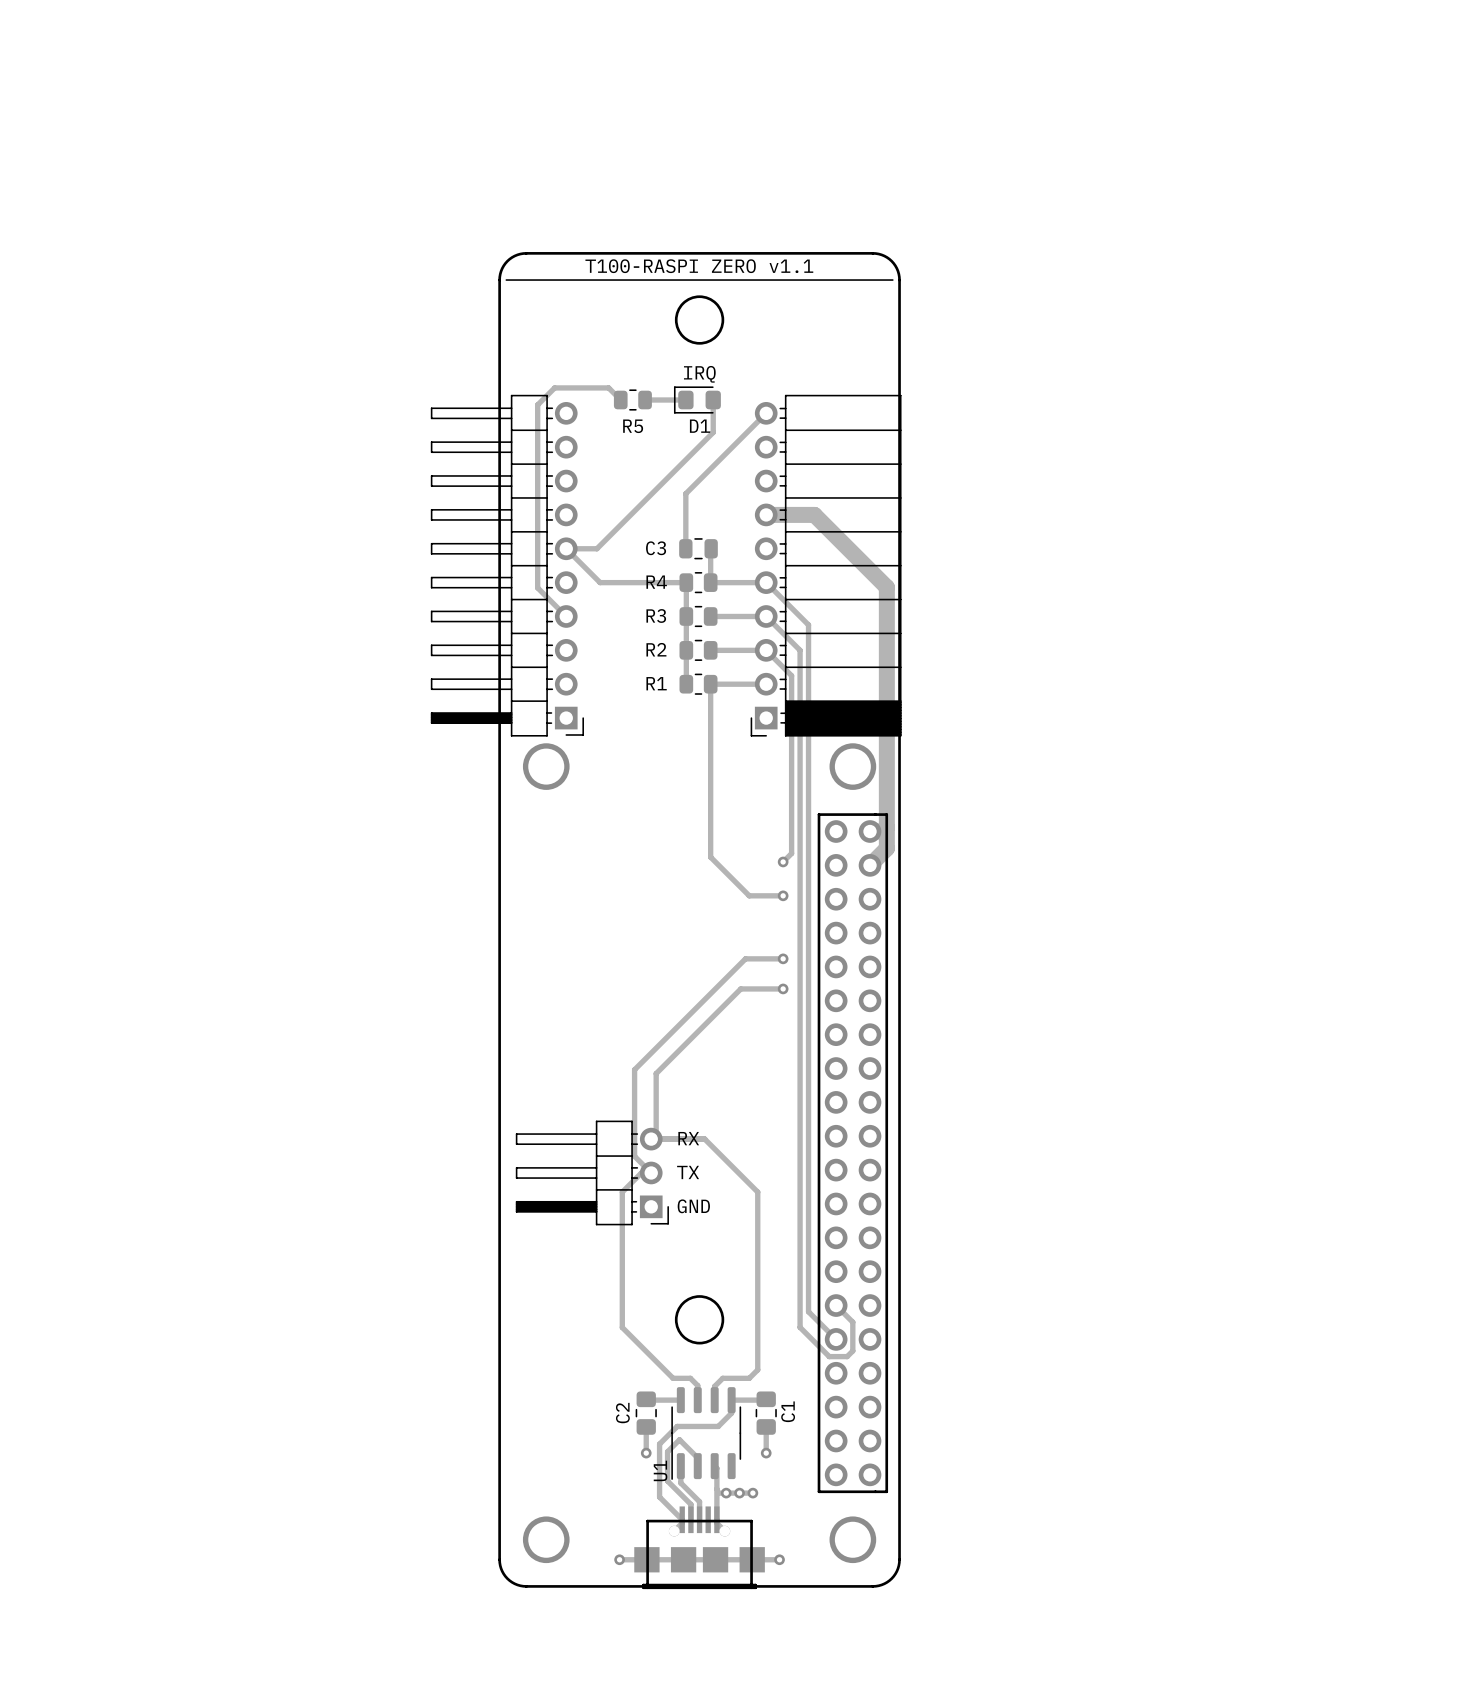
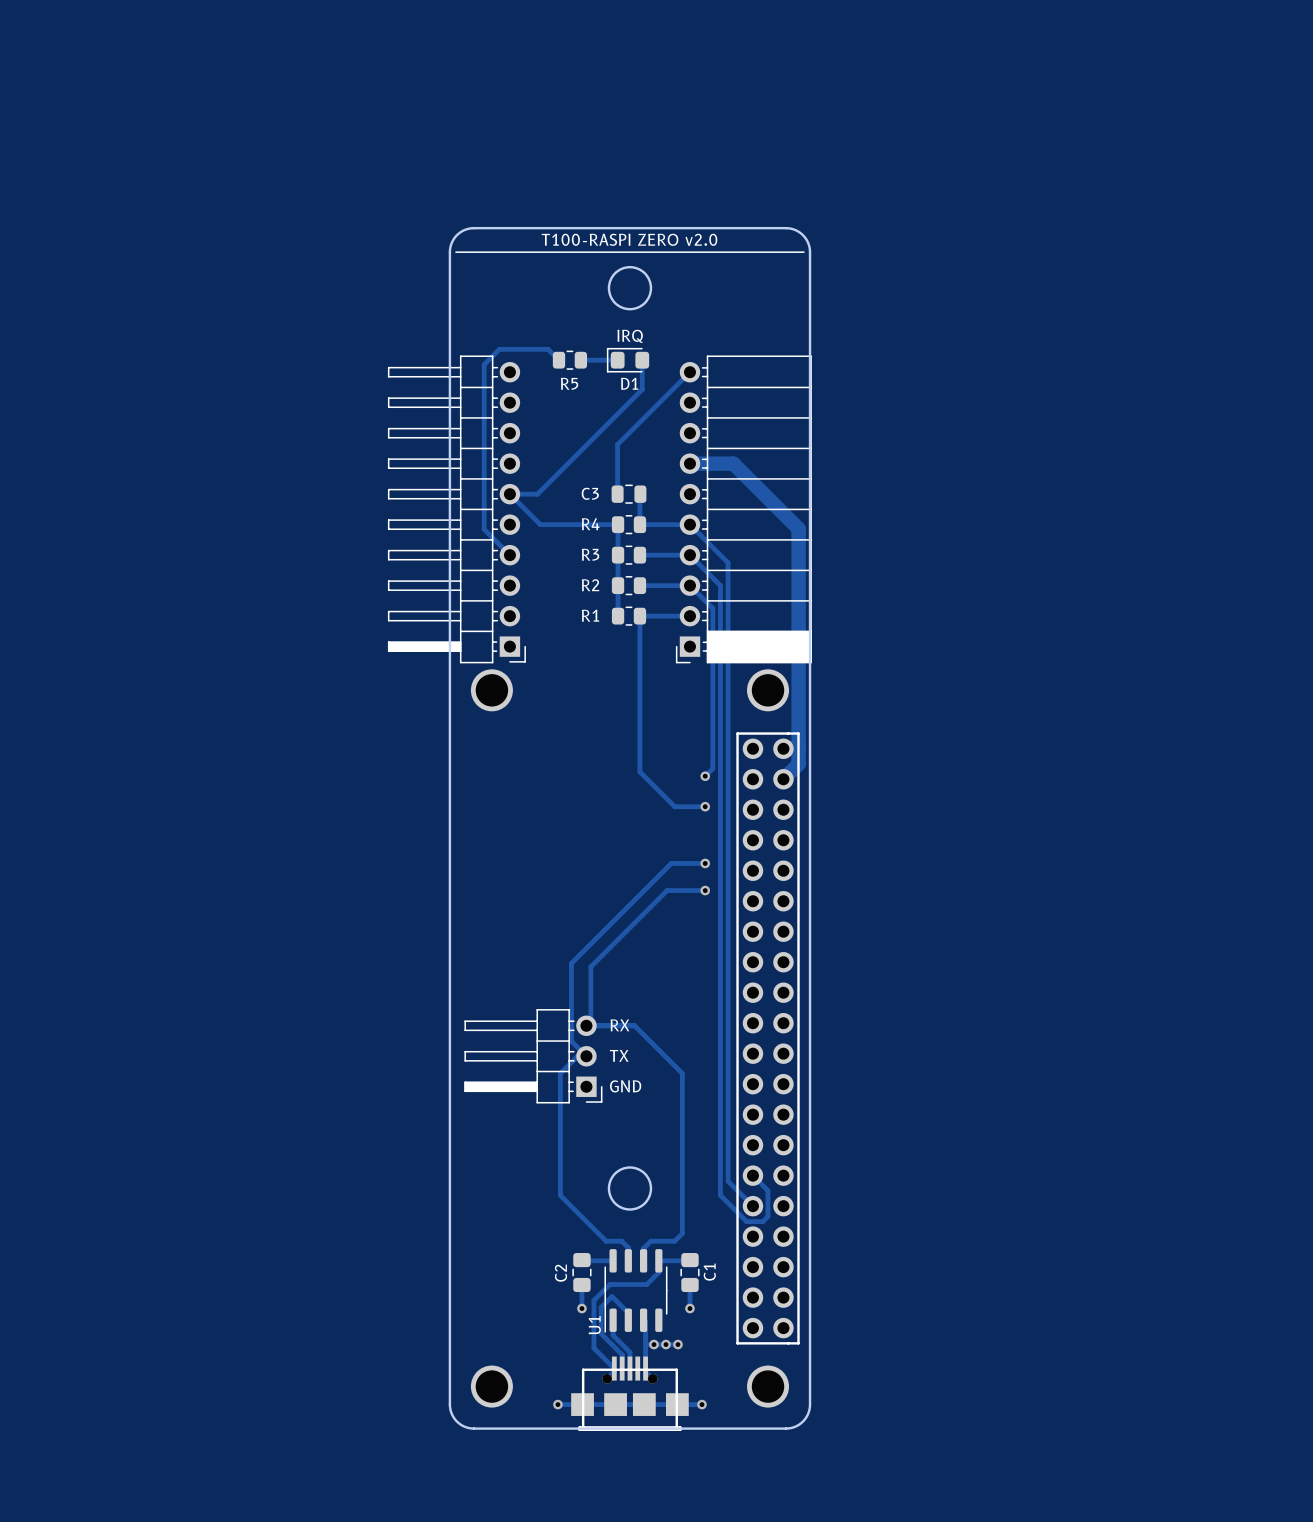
text: T100-RASPI ZERO v1.1 (699, 266) -> T100-RASPI ZERO v2.0 (629, 239)

